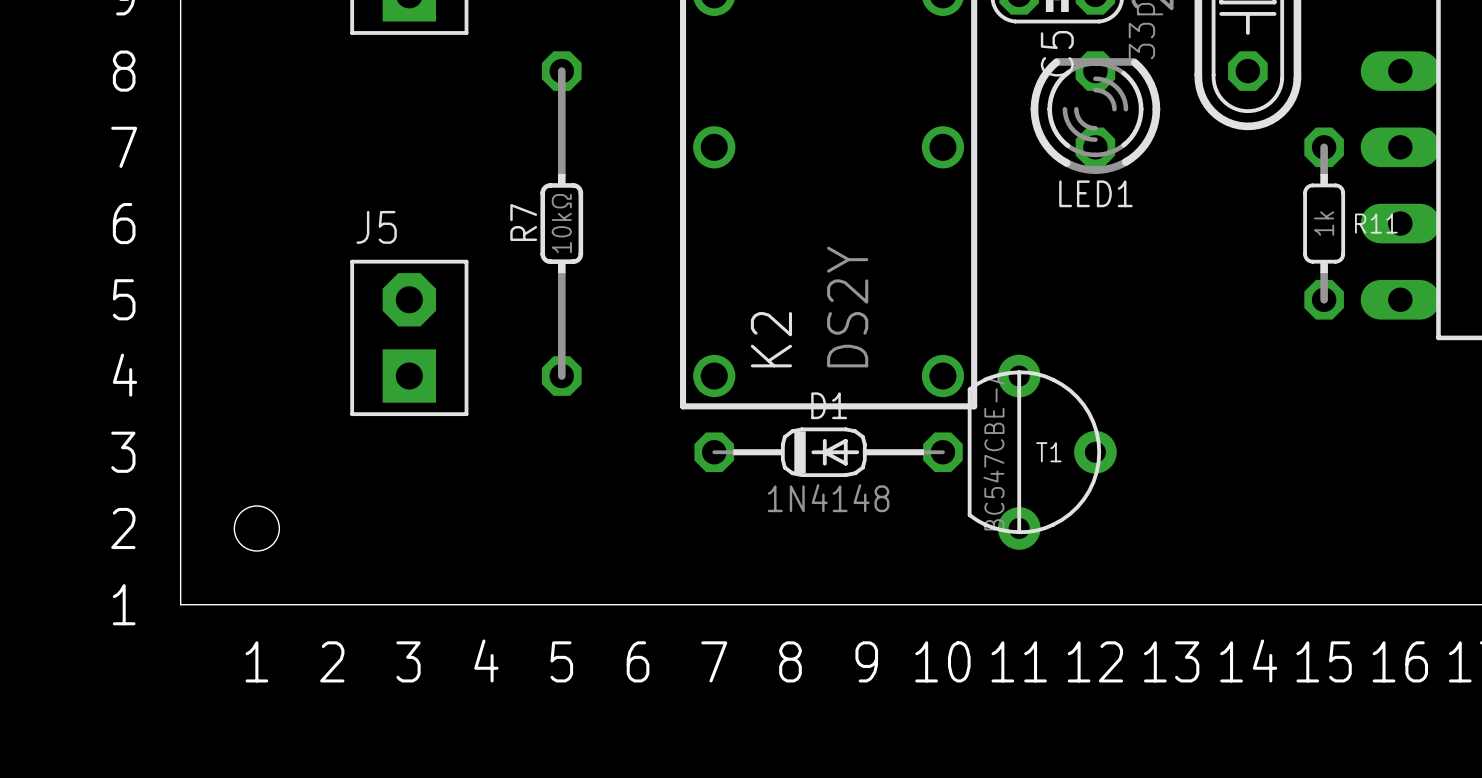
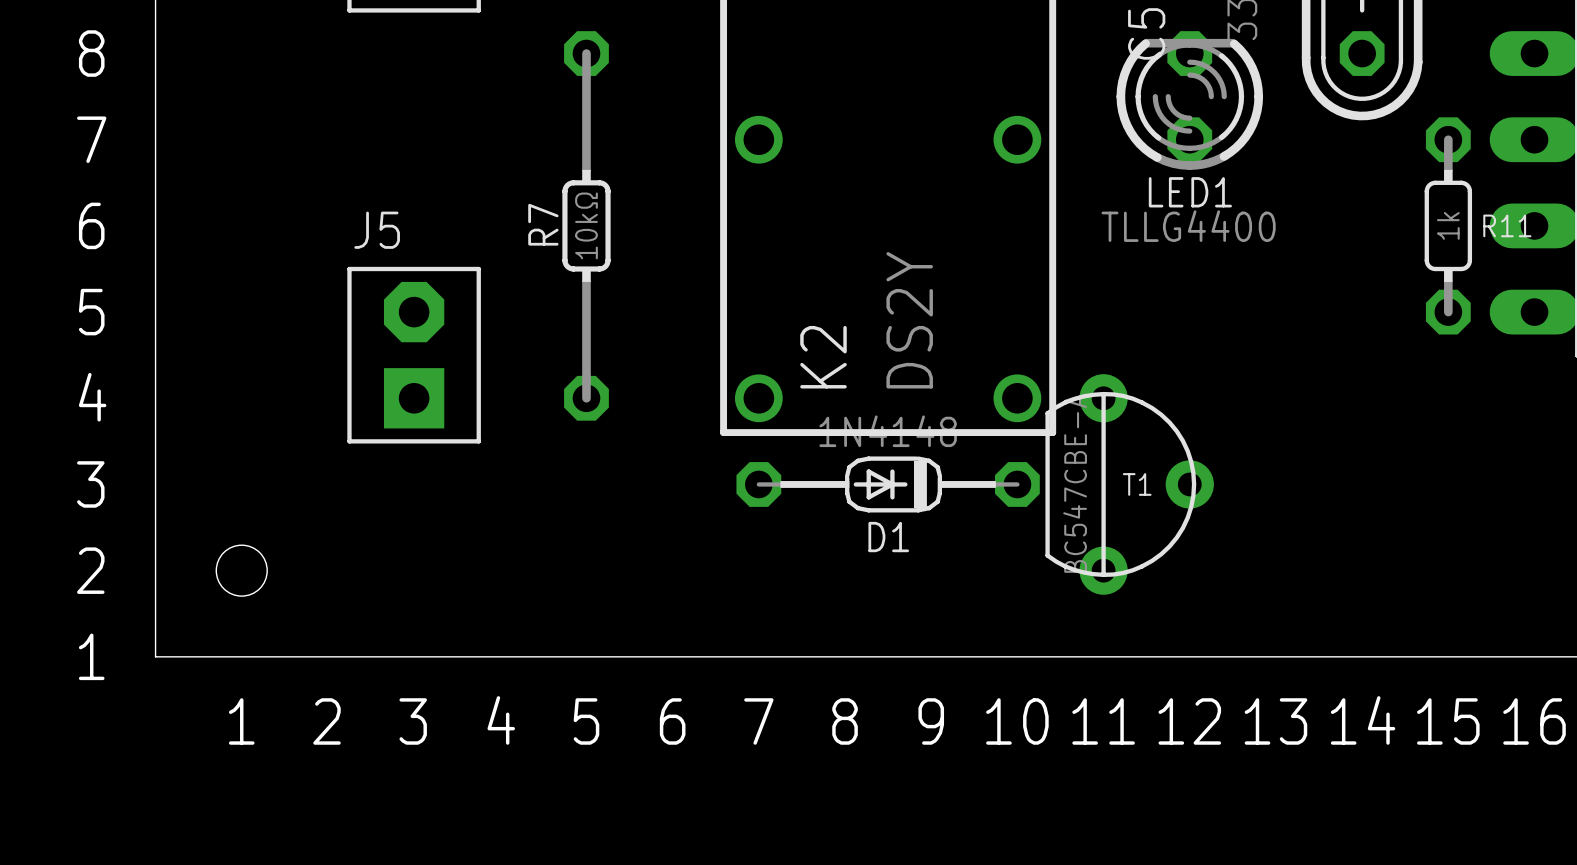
LED1 value: none -> TLLG4400 (1188, 226)
D1 rotation: 0° (828, 452) -> 180° (888, 484)

